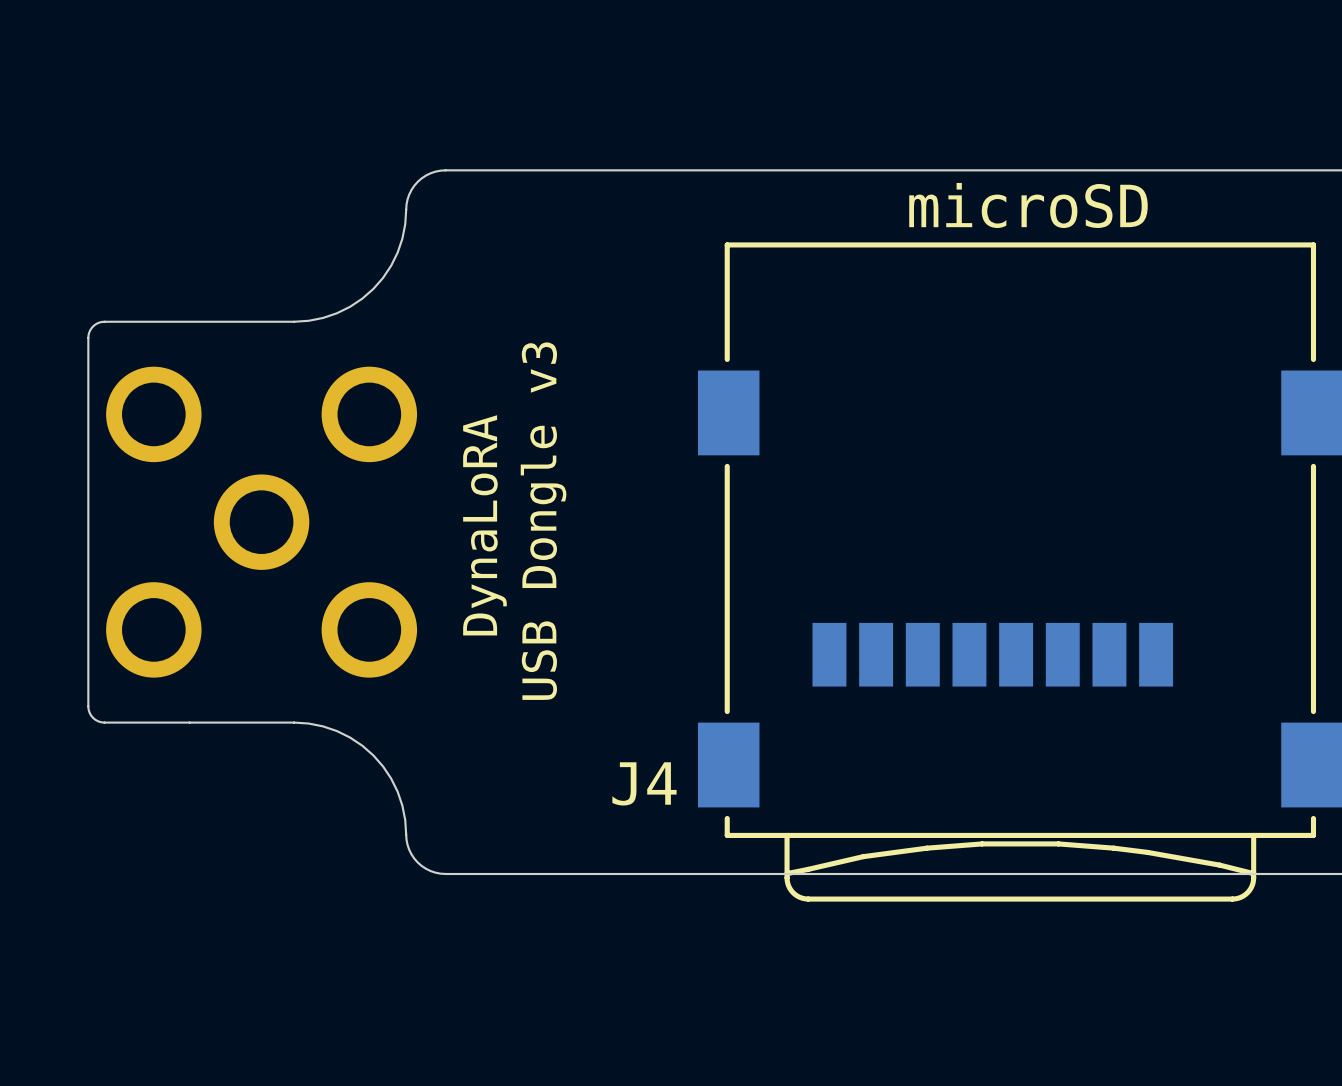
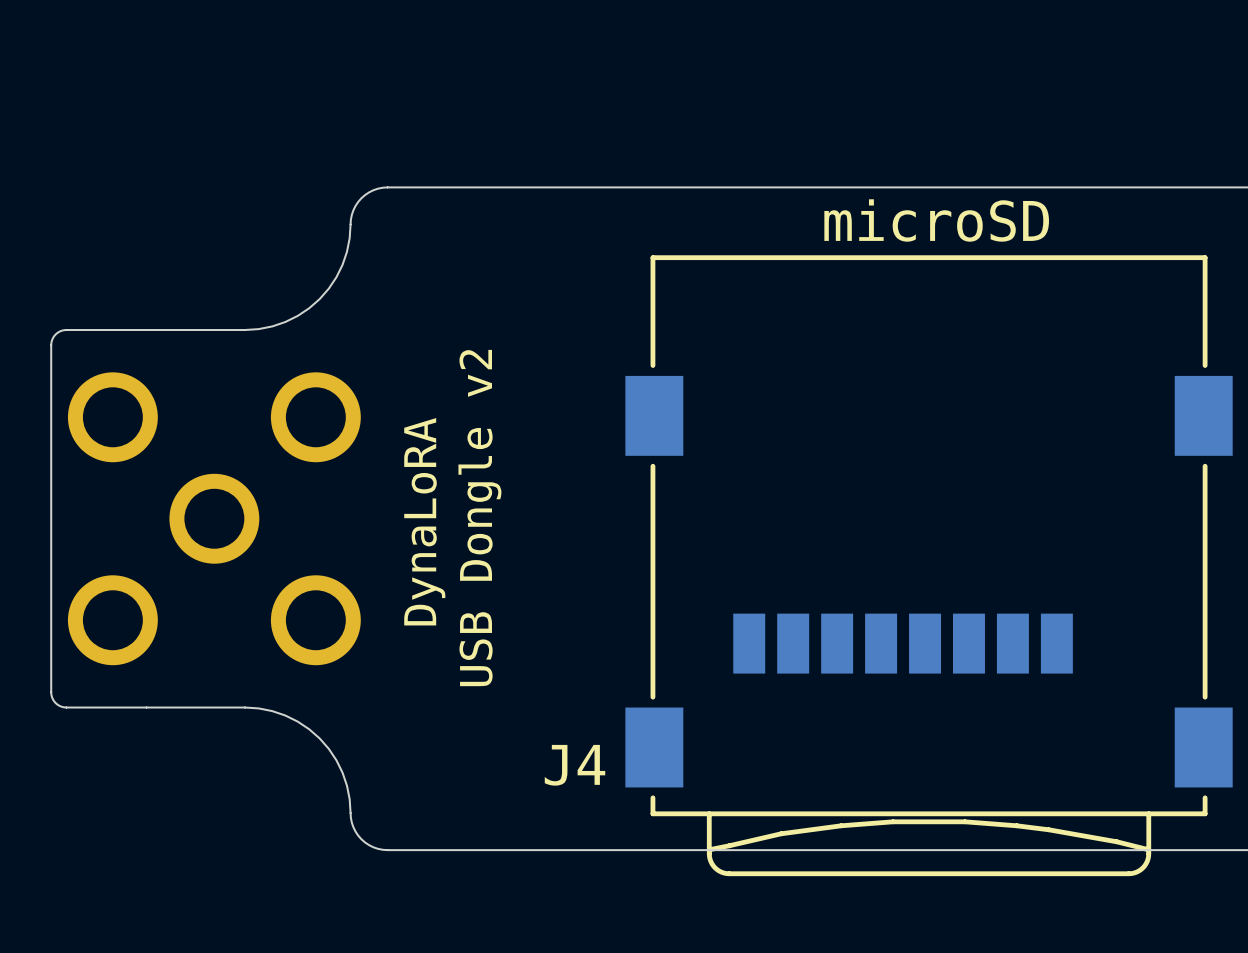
text: USB Dongle v3 (543, 521) -> USB Dongle v2 (479, 518)

